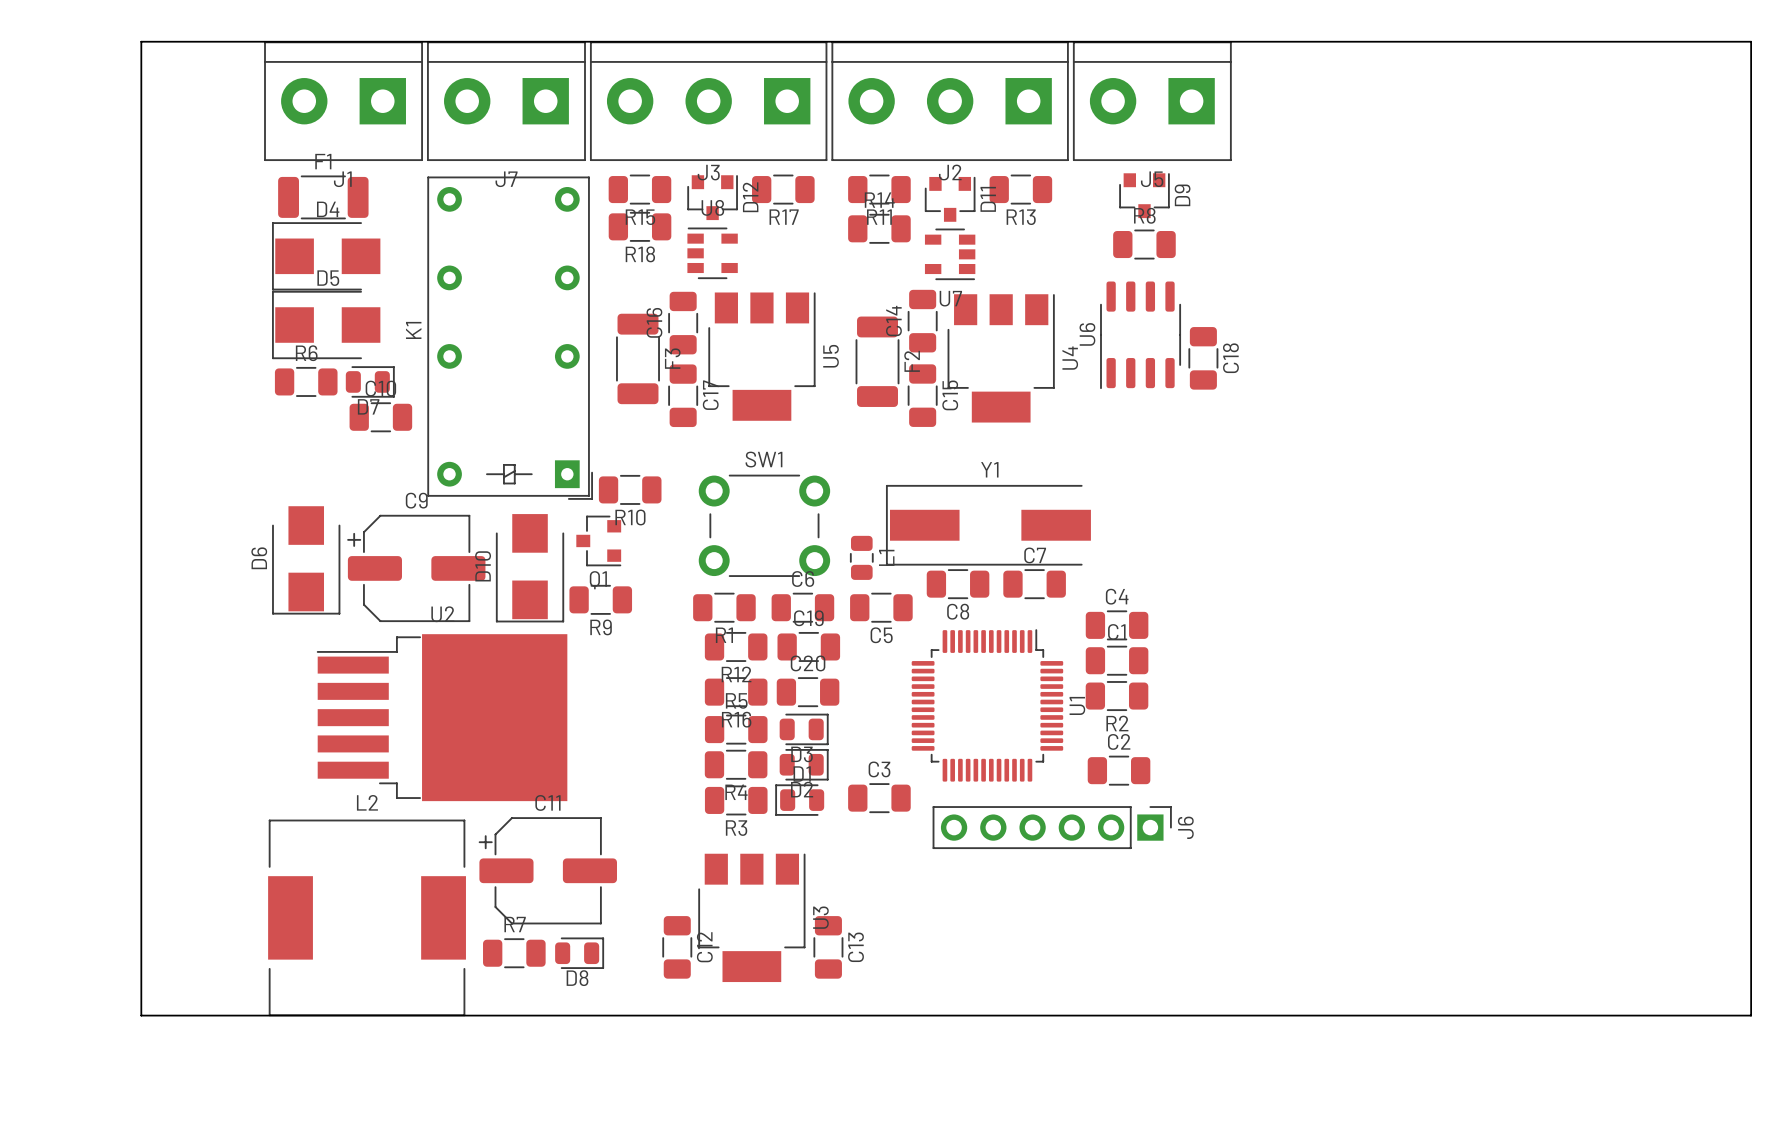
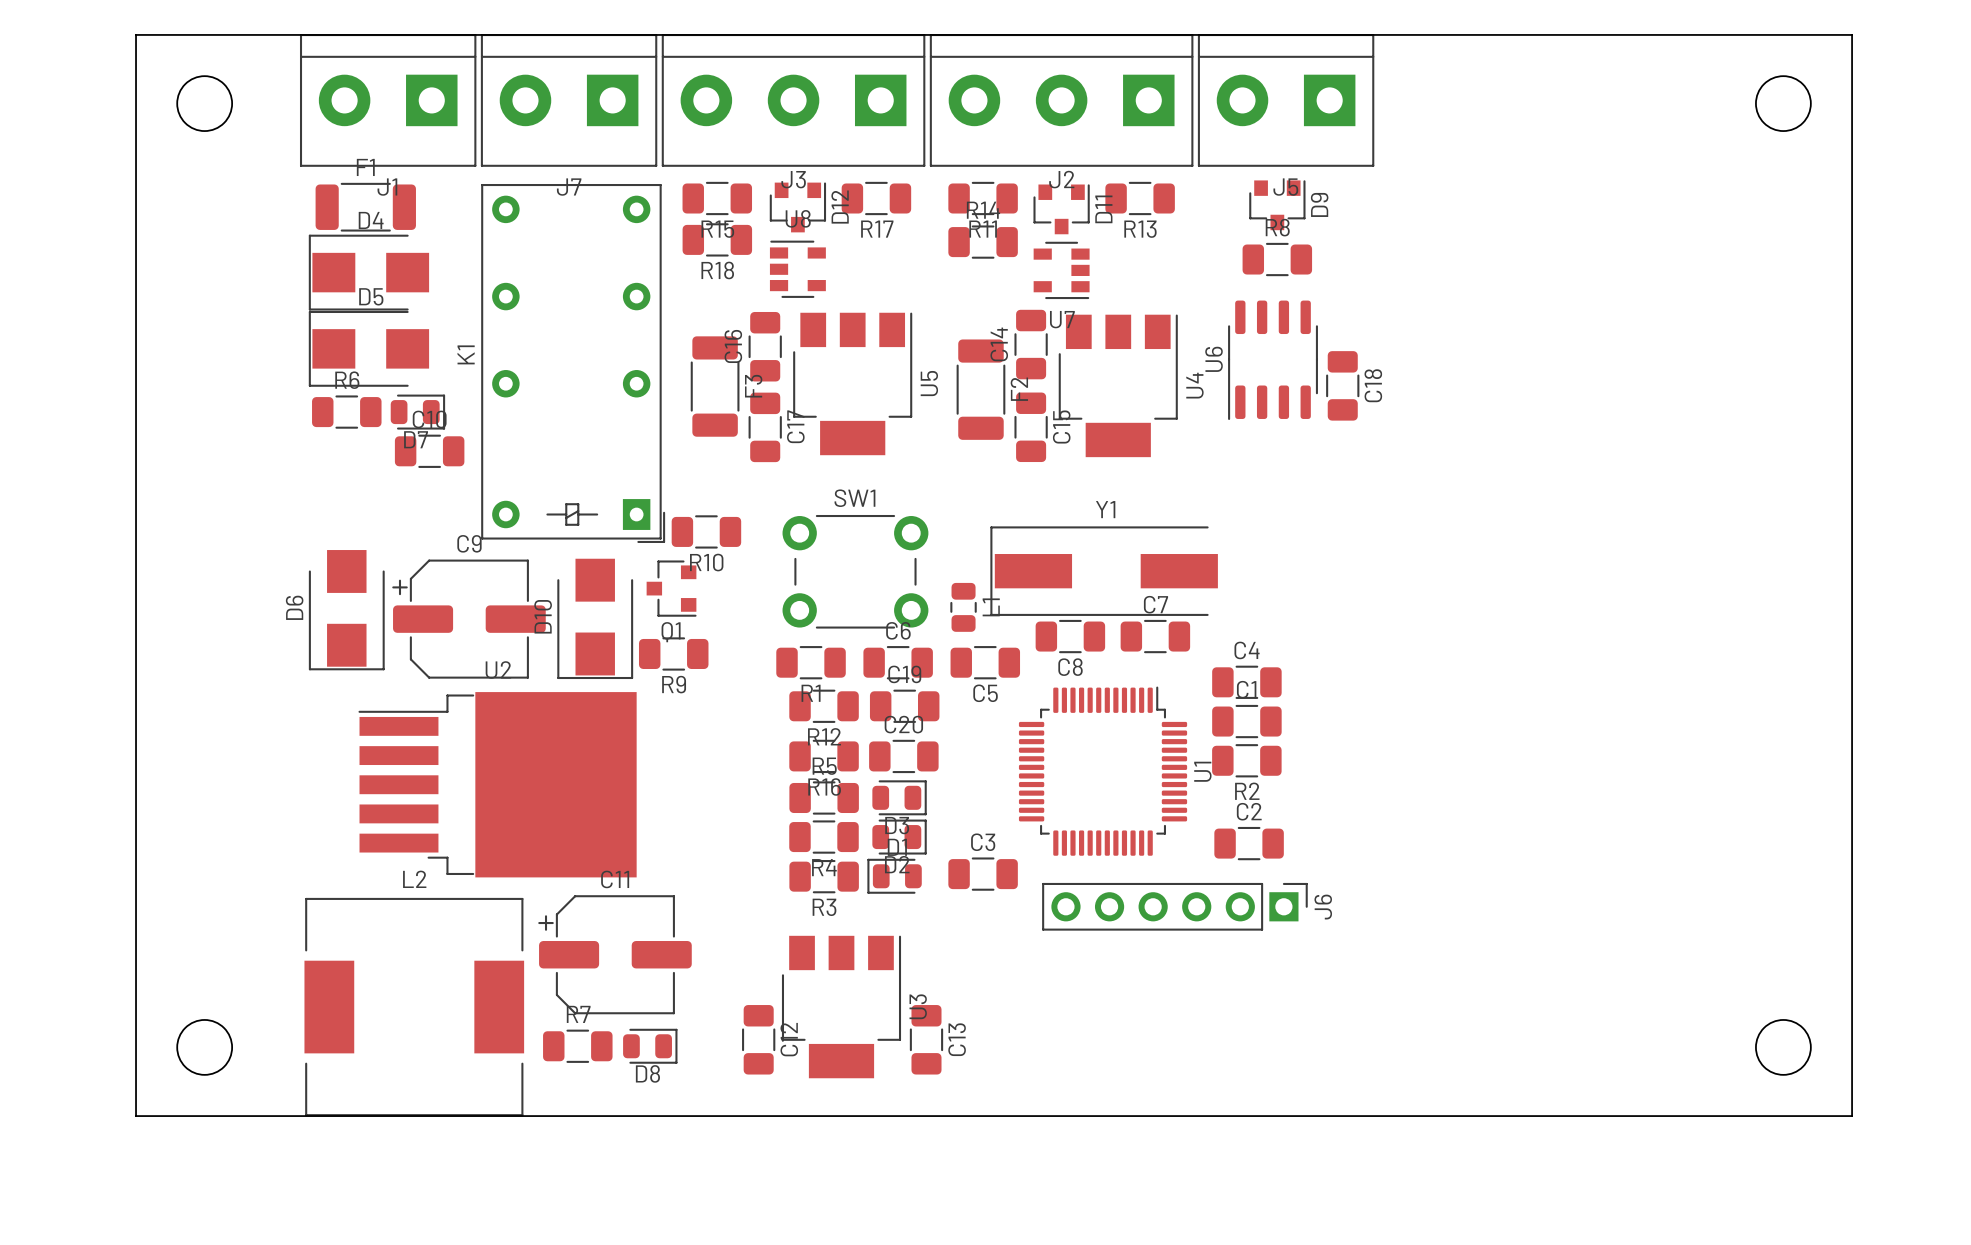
board edge: (141, 41) (141, 1015) (1751, 1015) (1751, 41) (141, 41) -> (136, 34) (136, 1116) (1852, 1116) (1852, 34) (136, 34)
round board edge: none -> [176, 75, 233, 132]
round board edge: none -> [1755, 75, 1812, 132]
round board edge: none -> [176, 1019, 233, 1076]
round board edge: none -> [1755, 1019, 1812, 1076]

